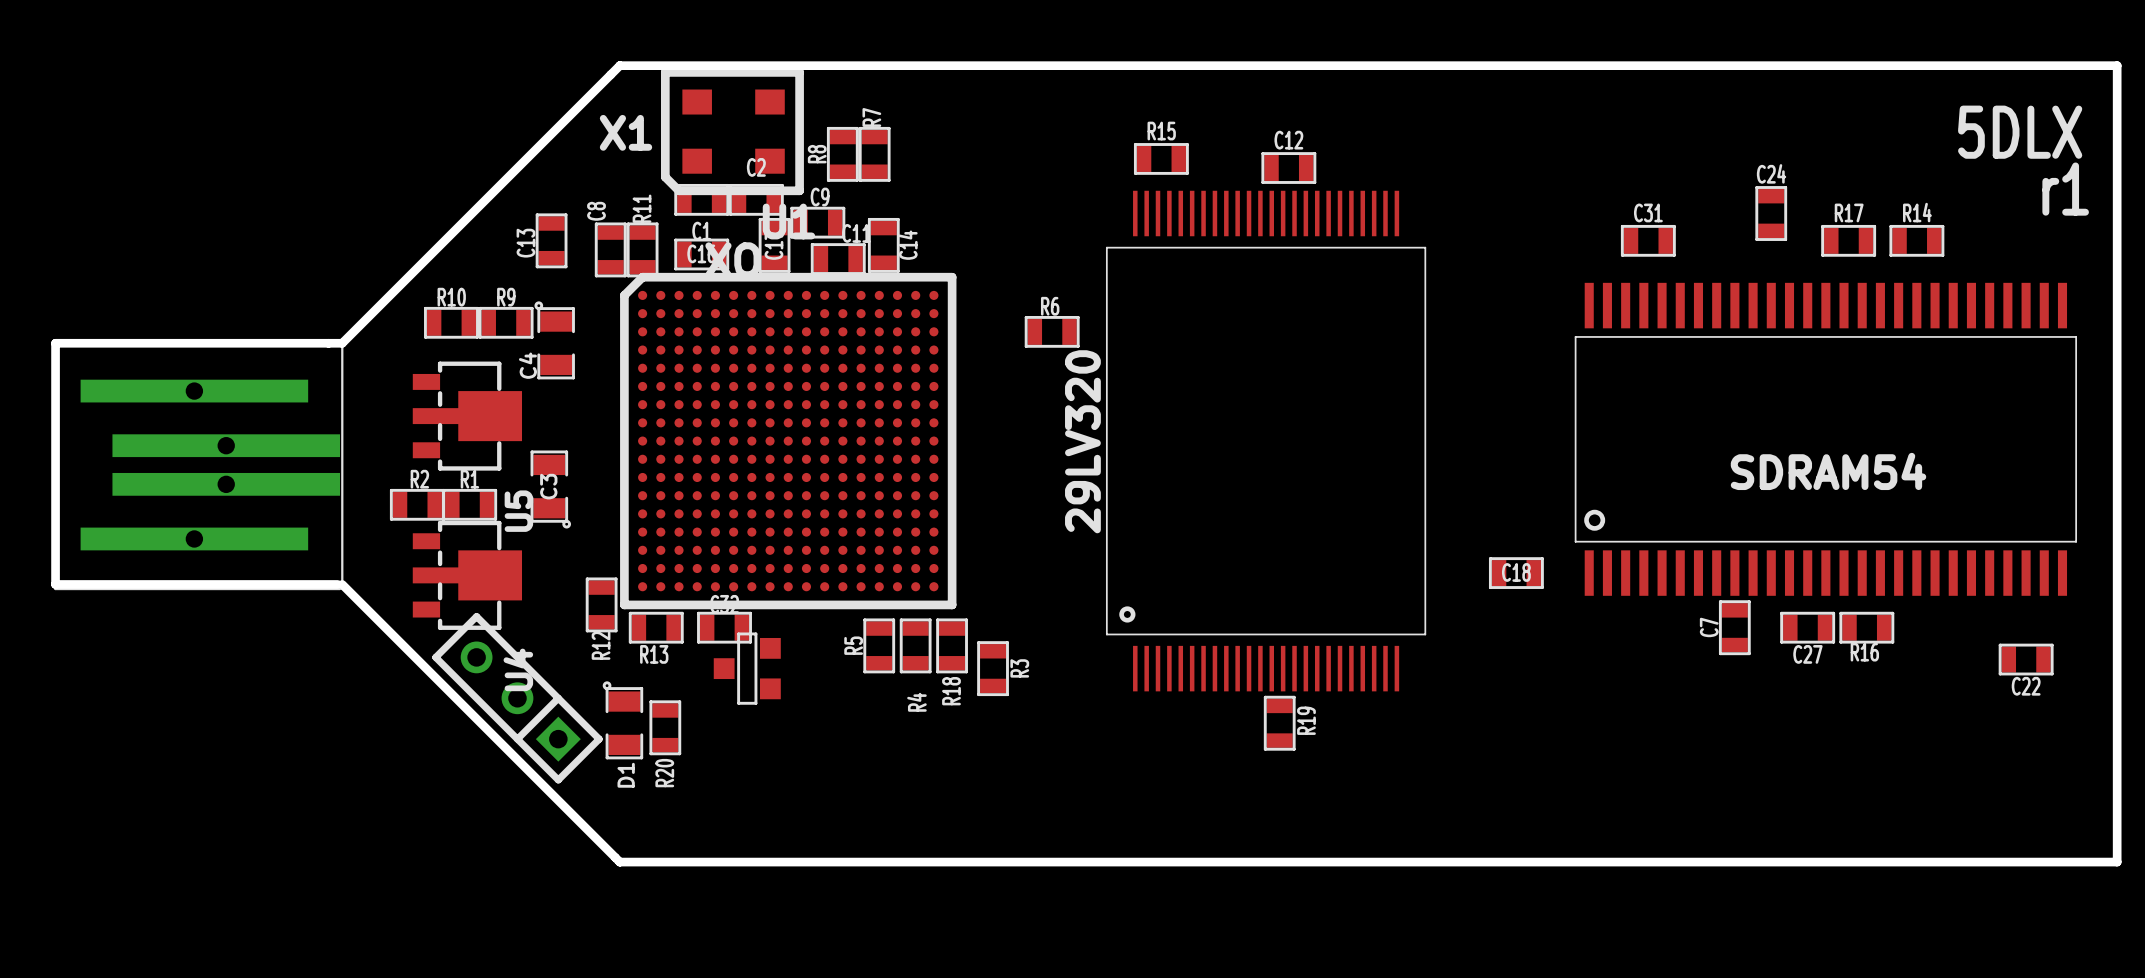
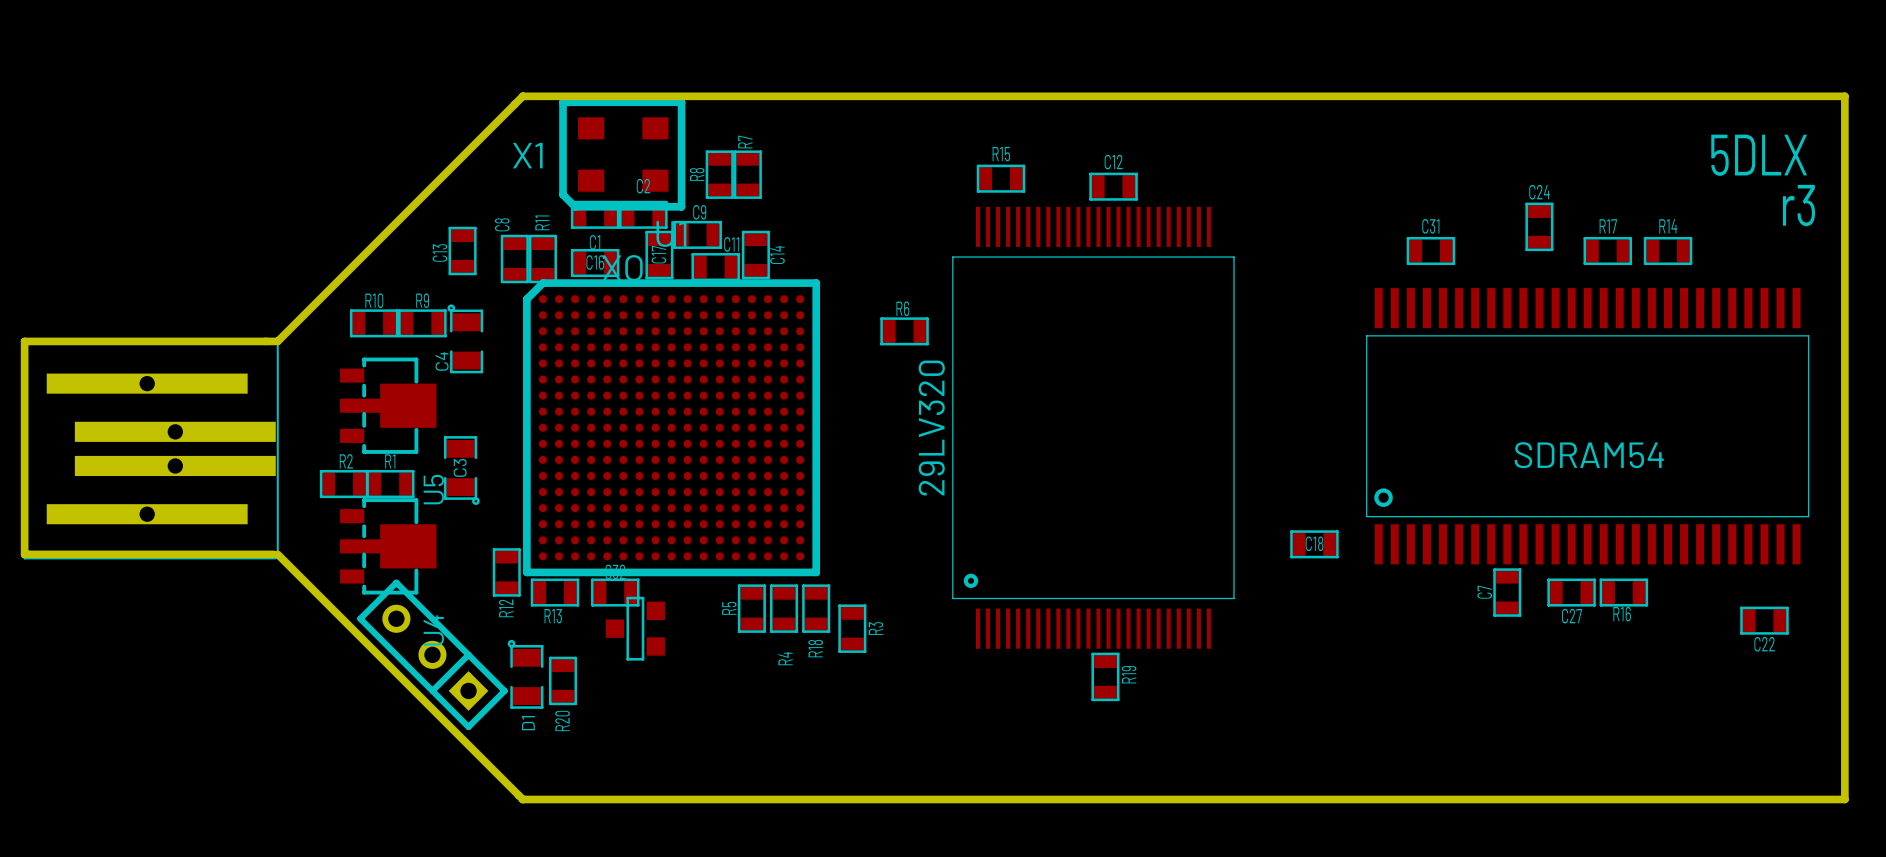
text: r1 (2065, 189) -> r3 (1798, 205)

